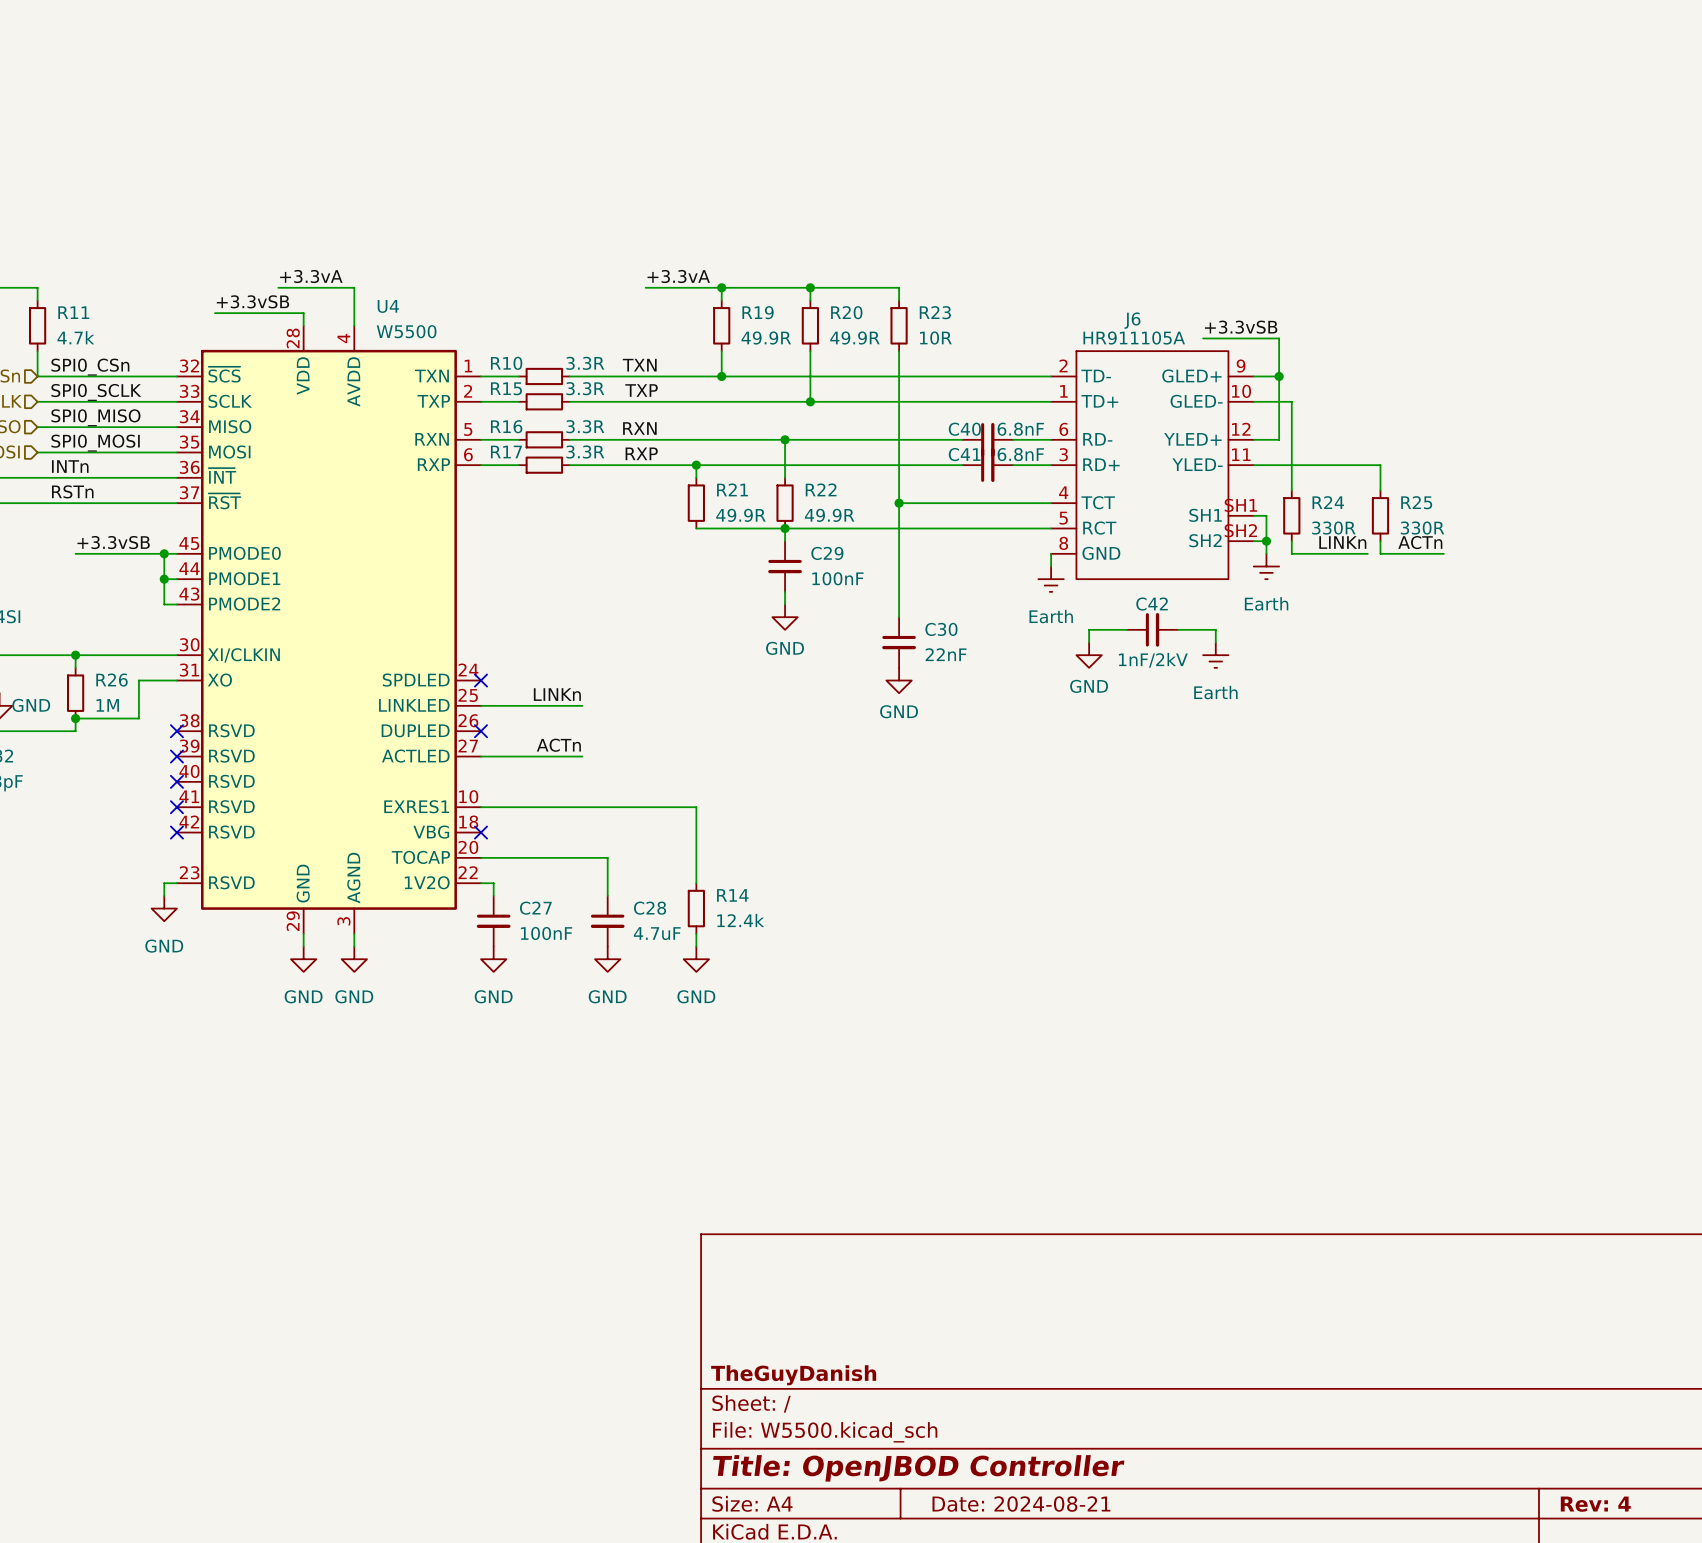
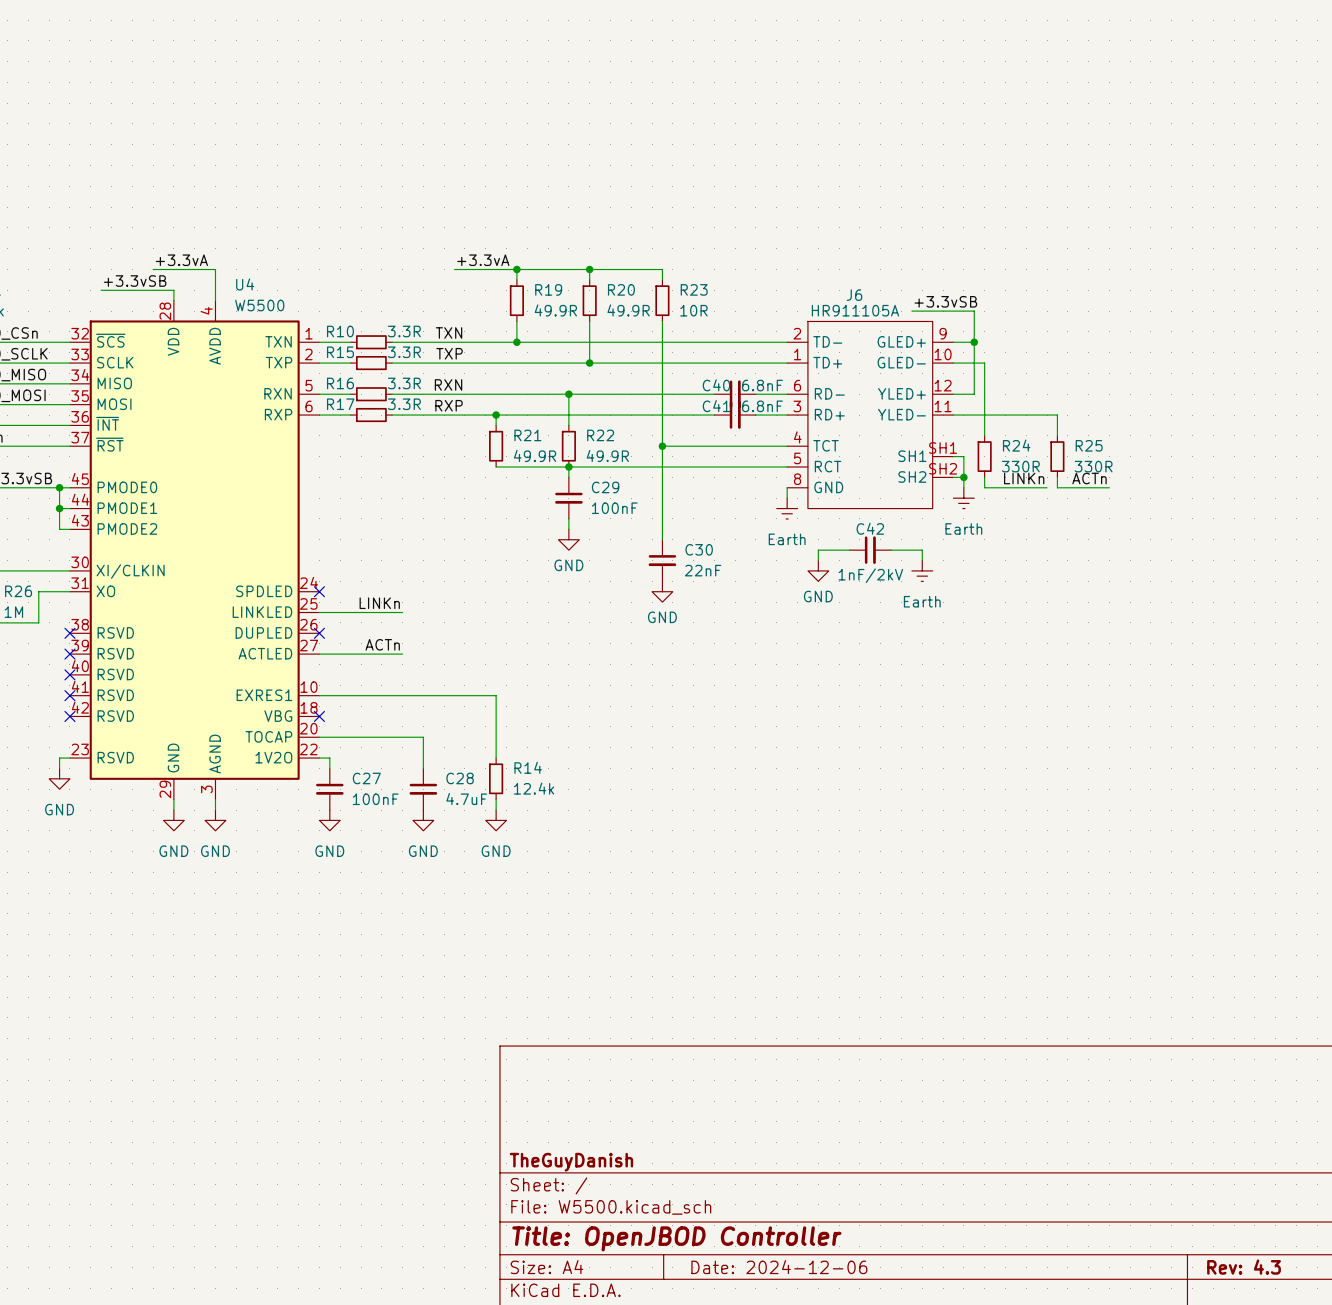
title block: Date: 2024-08-21 (1021, 1504) -> Date: 2024-12-06 (779, 1267)
title block: Rev: 4 (1595, 1504) -> Rev: 4.3 (1244, 1267)

